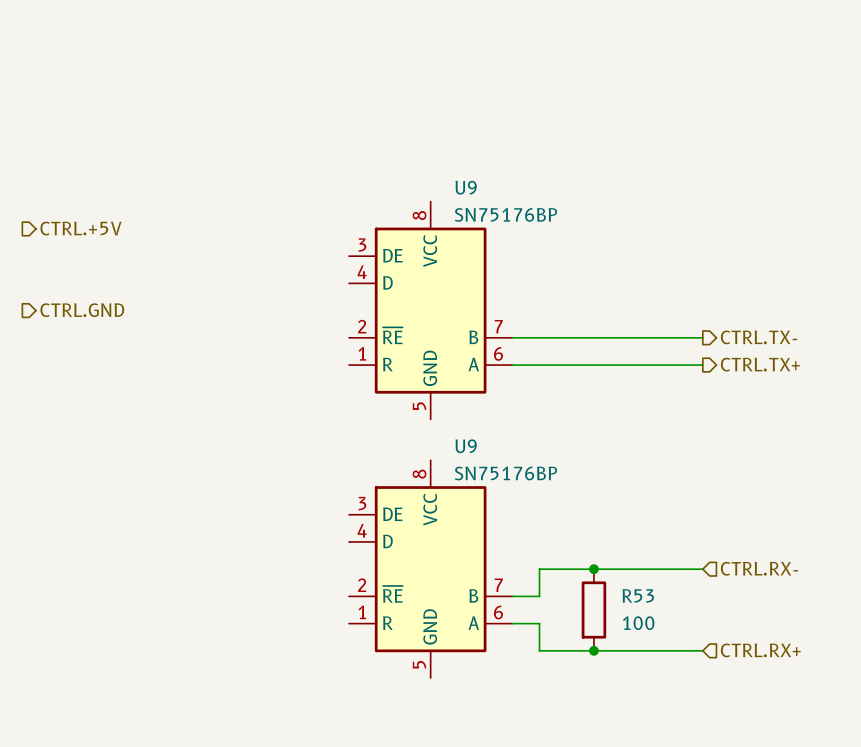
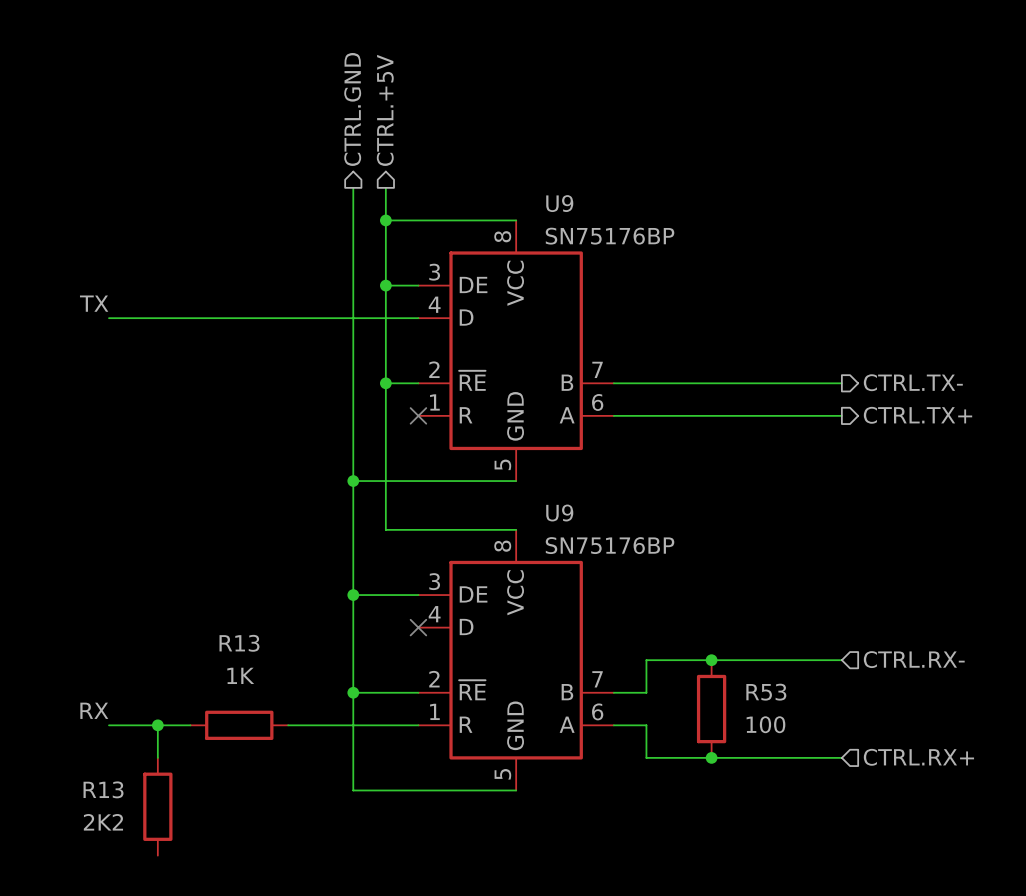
hierarchical label: none -> CTRL.GND (352, 109)
hierarchical label: none -> CTRL.+5V (385, 110)
wire: none -> (353, 187) (353, 790) (516, 790)
wire: none -> (385, 187) (385, 529) (516, 529)
wire: none -> (385, 220) (516, 220)
junction: none -> (385, 220)
hierarchical label: CTRL.+5V (80, 228) -> none
wire: none -> (385, 285) (418, 285)
junction: none -> (385, 285)
label: none -> TX (94, 303)
wire: none -> (108, 318) (418, 318)
hierarchical label: CTRL.GND (82, 310) -> none
wire: none -> (385, 383) (418, 383)
junction: none -> (385, 383)
no-connect mark: none -> (418, 415)
wire: none -> (353, 481) (516, 481)
junction: none -> (353, 481)
wire: none -> (353, 595) (418, 595)
junction: none -> (353, 595)
no-connect mark: none -> (418, 627)
wire: none -> (353, 692) (418, 692)
junction: none -> (353, 692)
label: none -> RX (94, 710)
wire: none -> (108, 725) (190, 725)
wire: none -> (157, 725) (157, 757)
junction: none -> (157, 725)
R13: none -> 1K (239, 725)
wire: none -> (288, 725) (418, 725)
R13: none -> 2K2 (157, 806)

